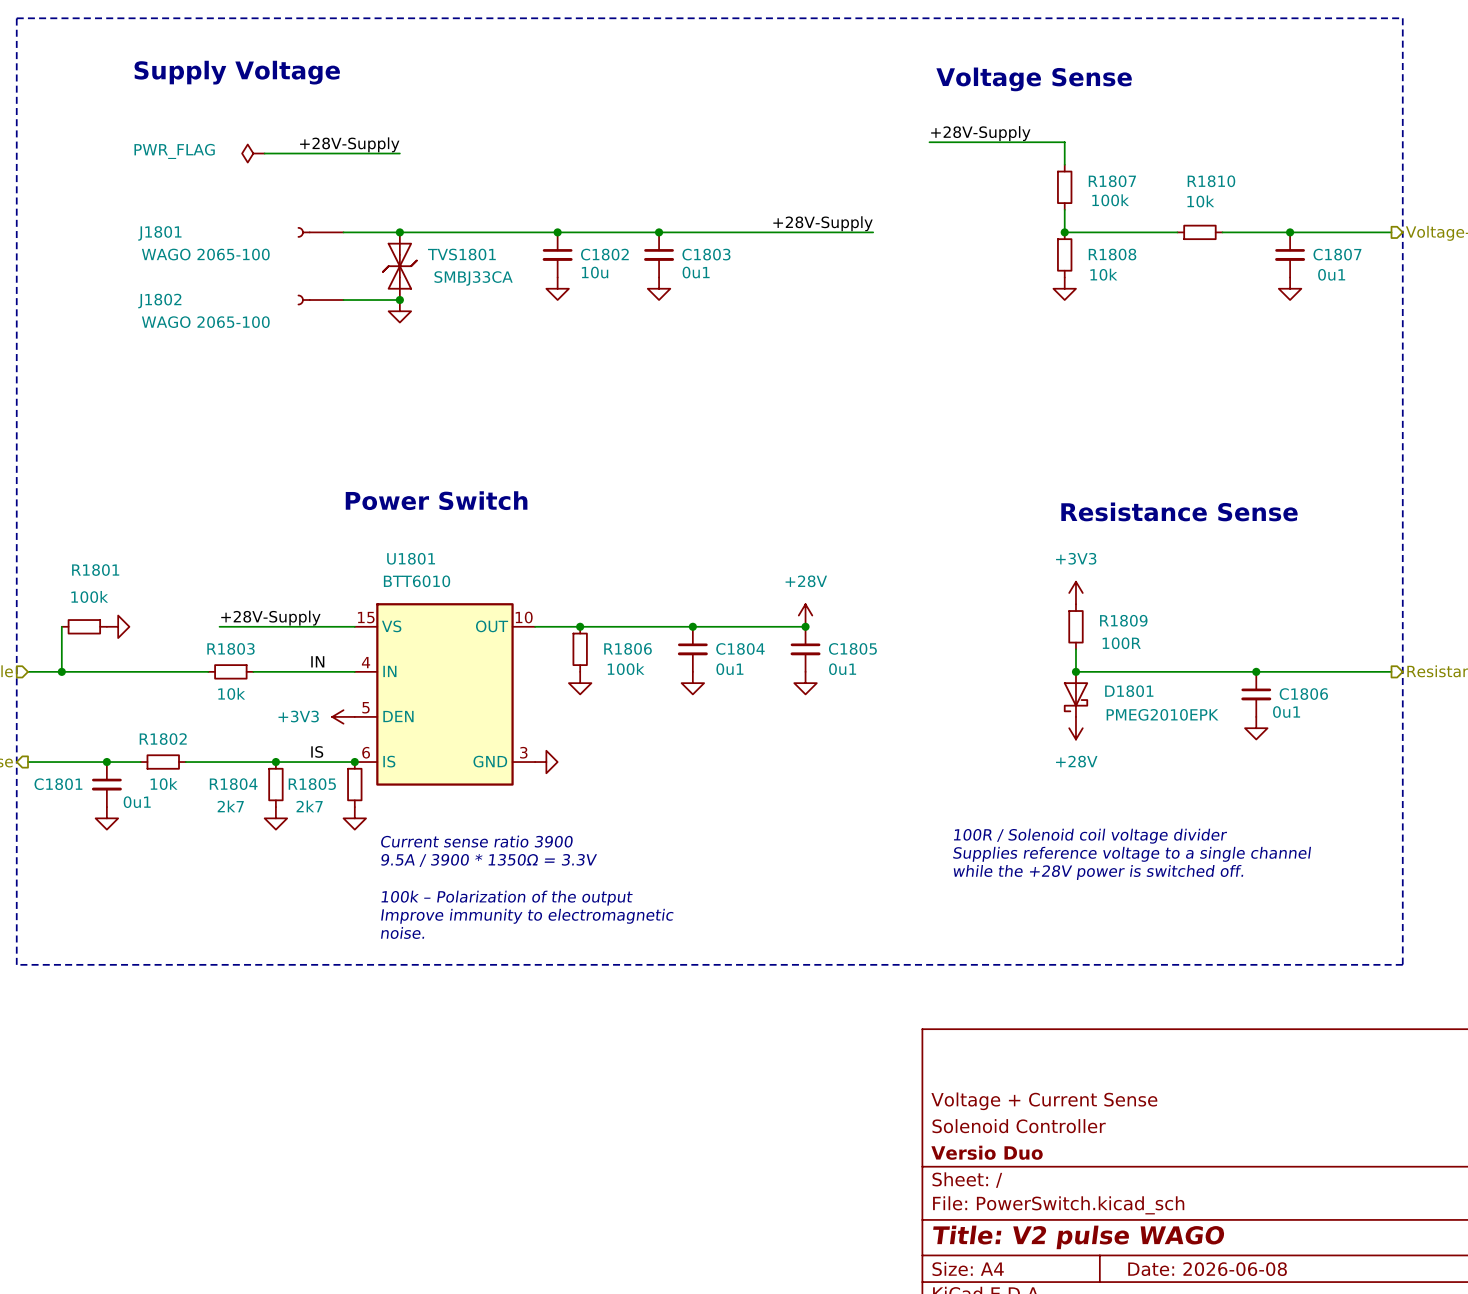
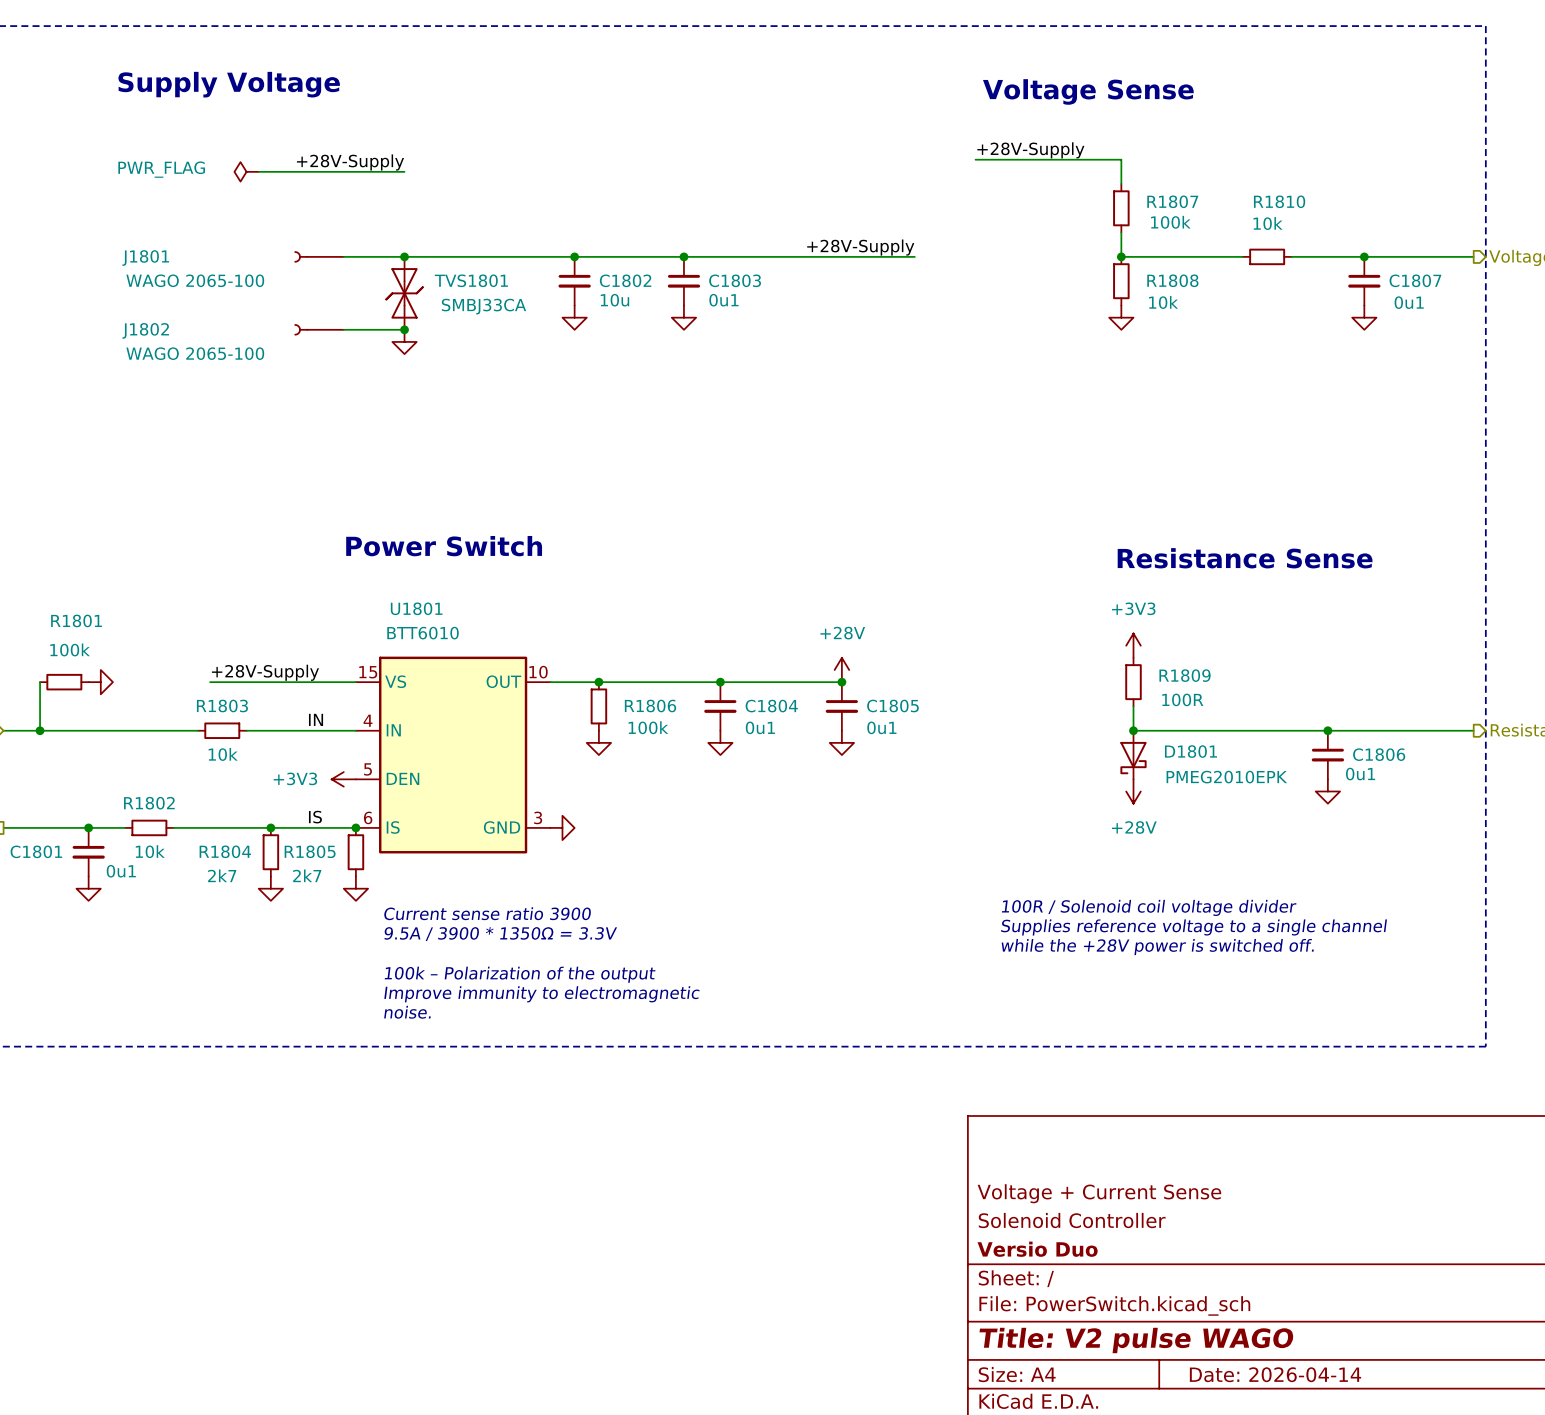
title block: Date: 2026-06-08 (1207, 1269) -> Date: 2026-04-14 (1275, 1374)

